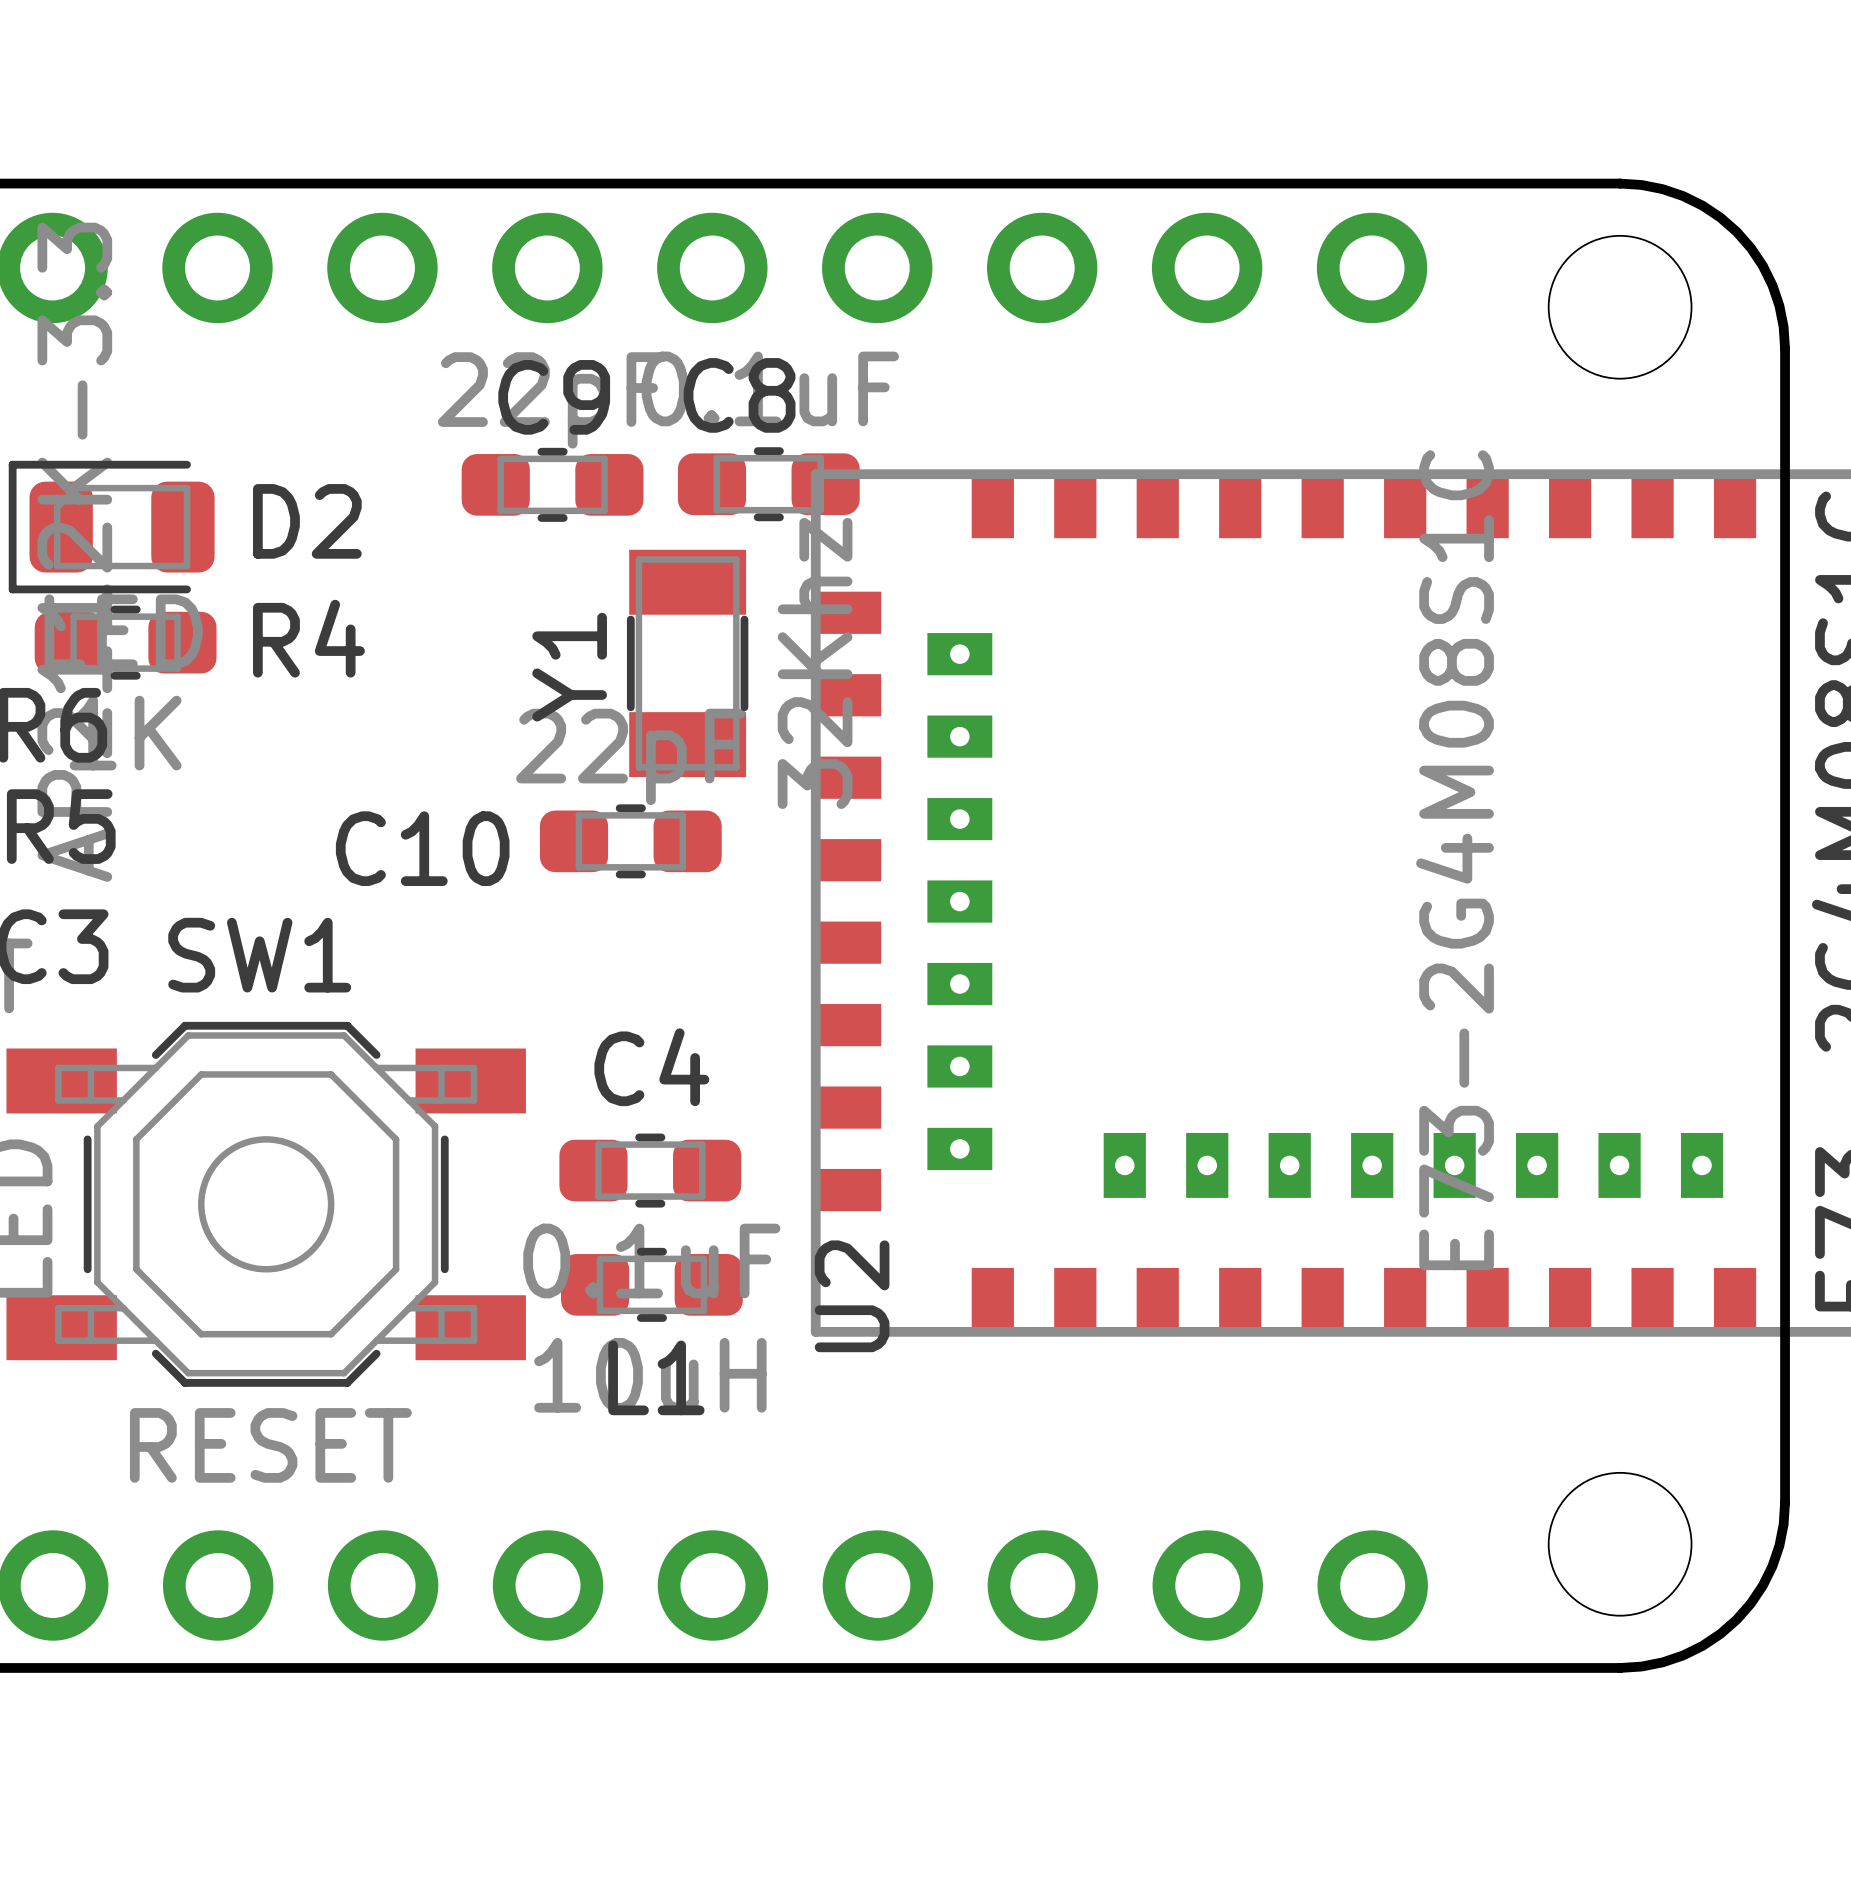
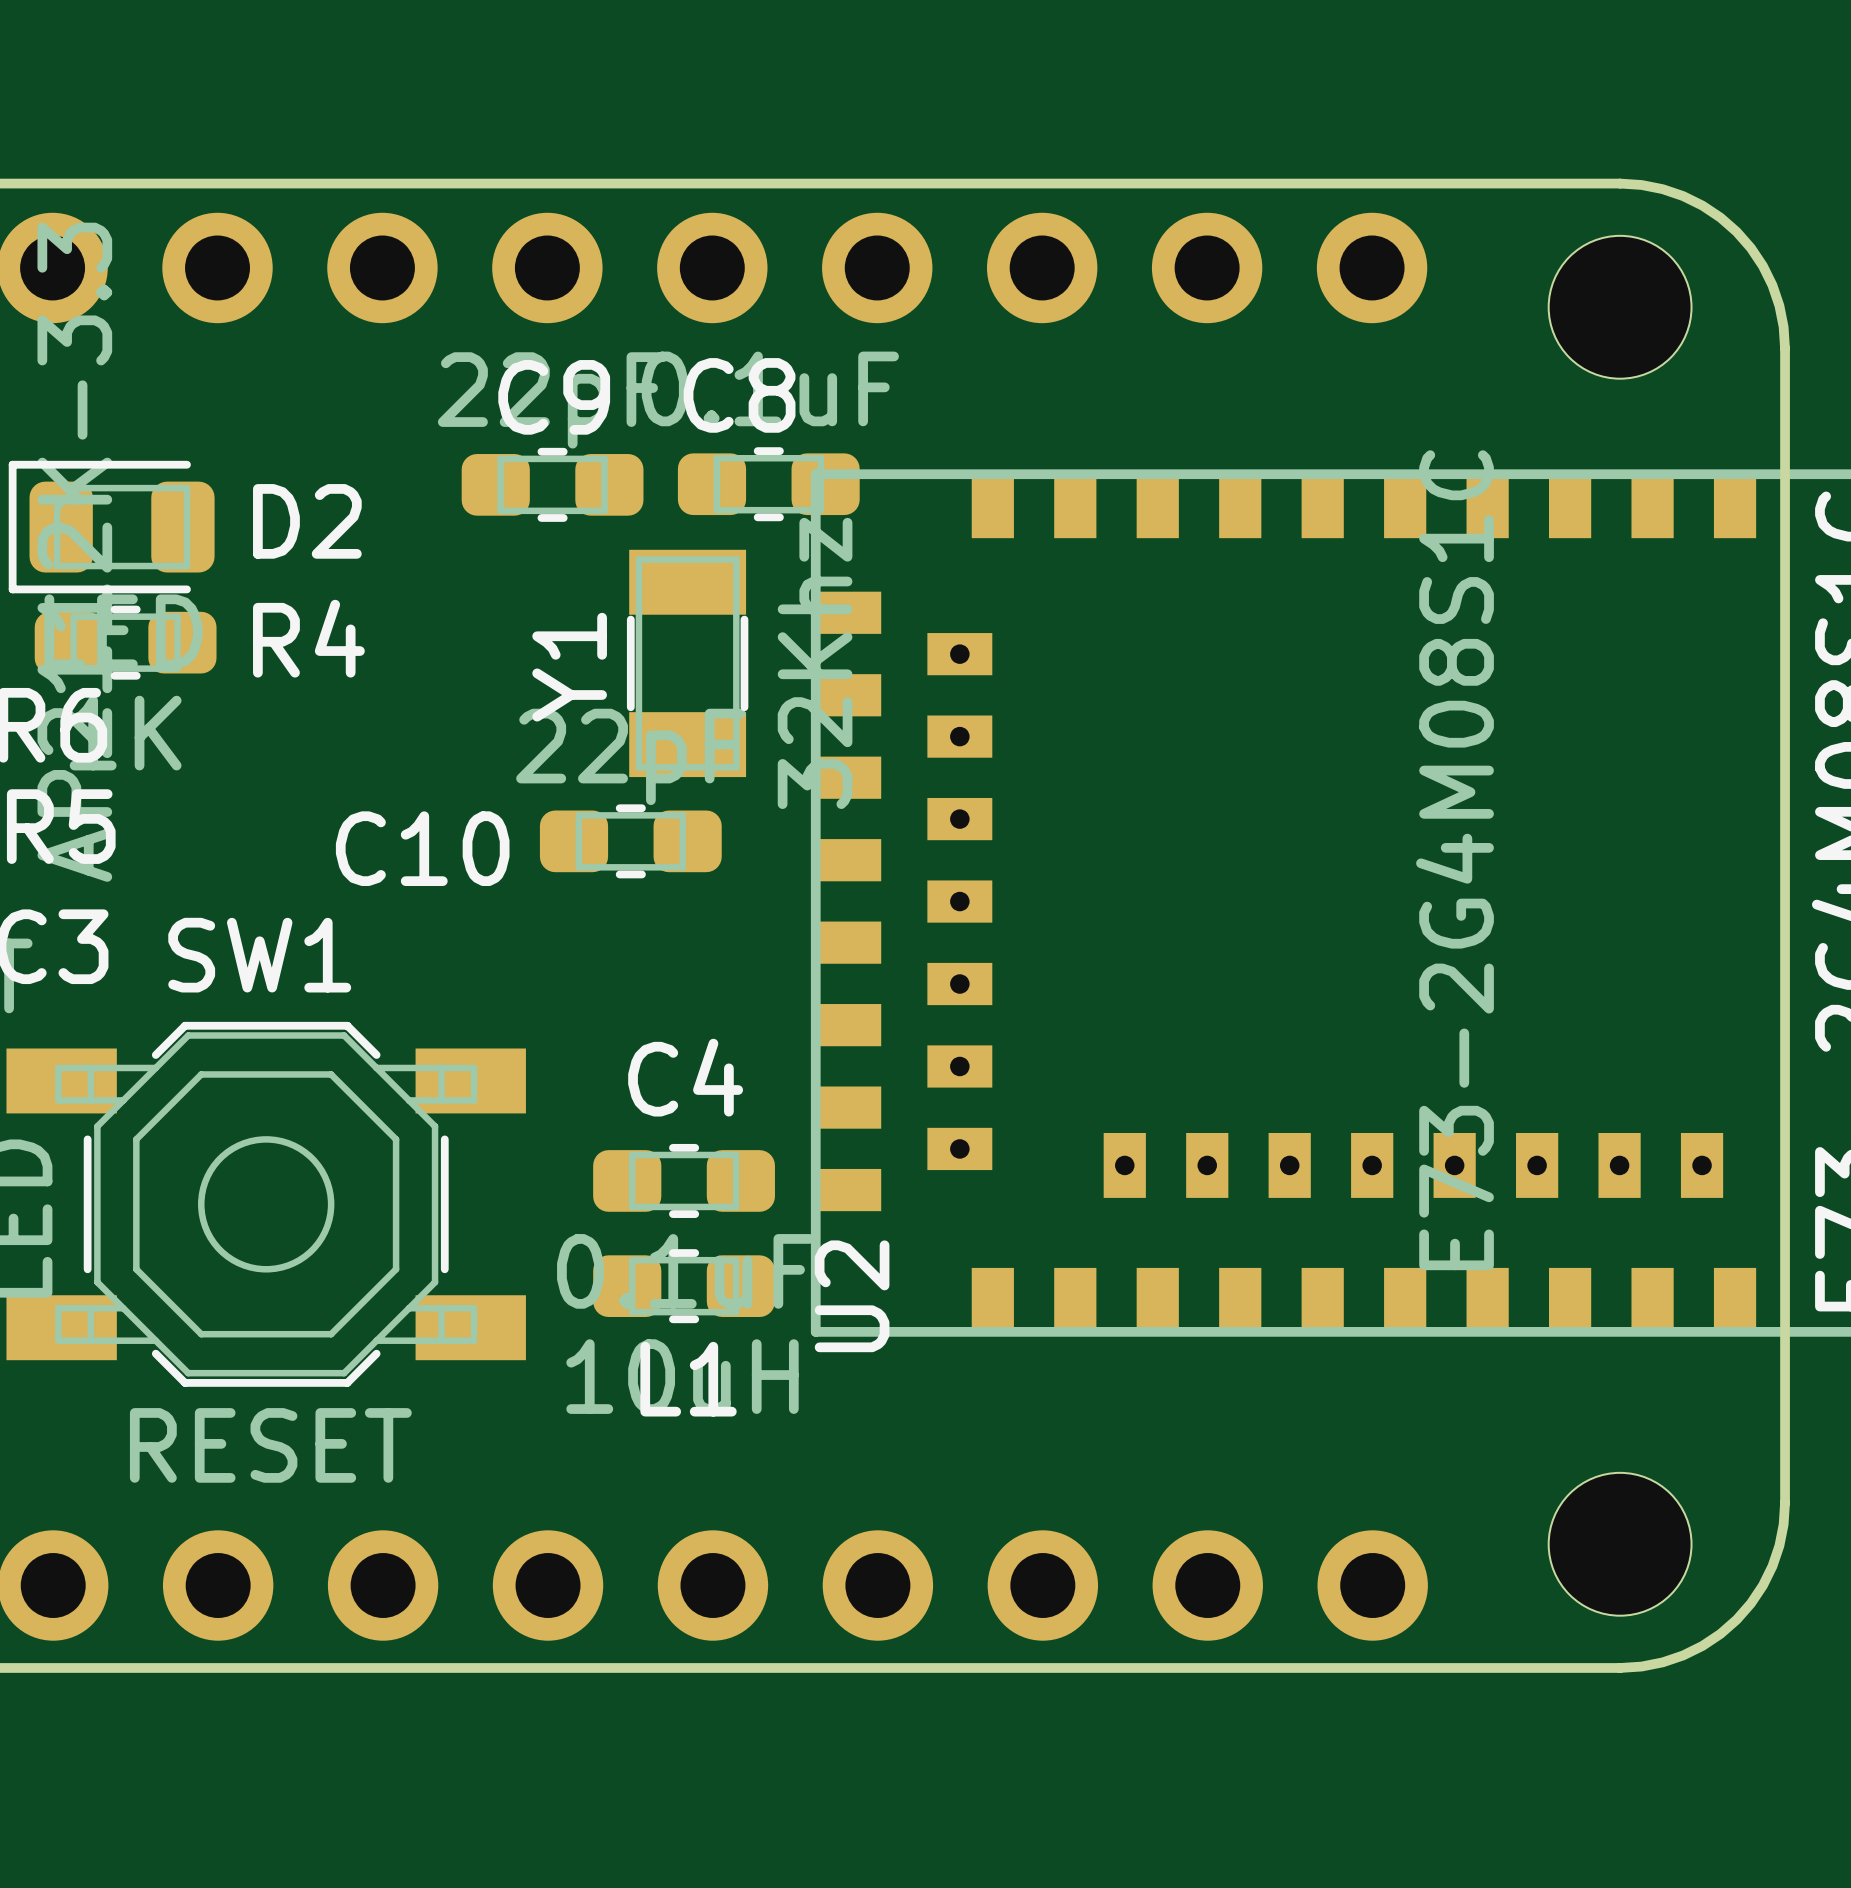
C4 position: (650, 1170) -> (684, 1180)
L1 position: (651, 1284) -> (684, 1286)

